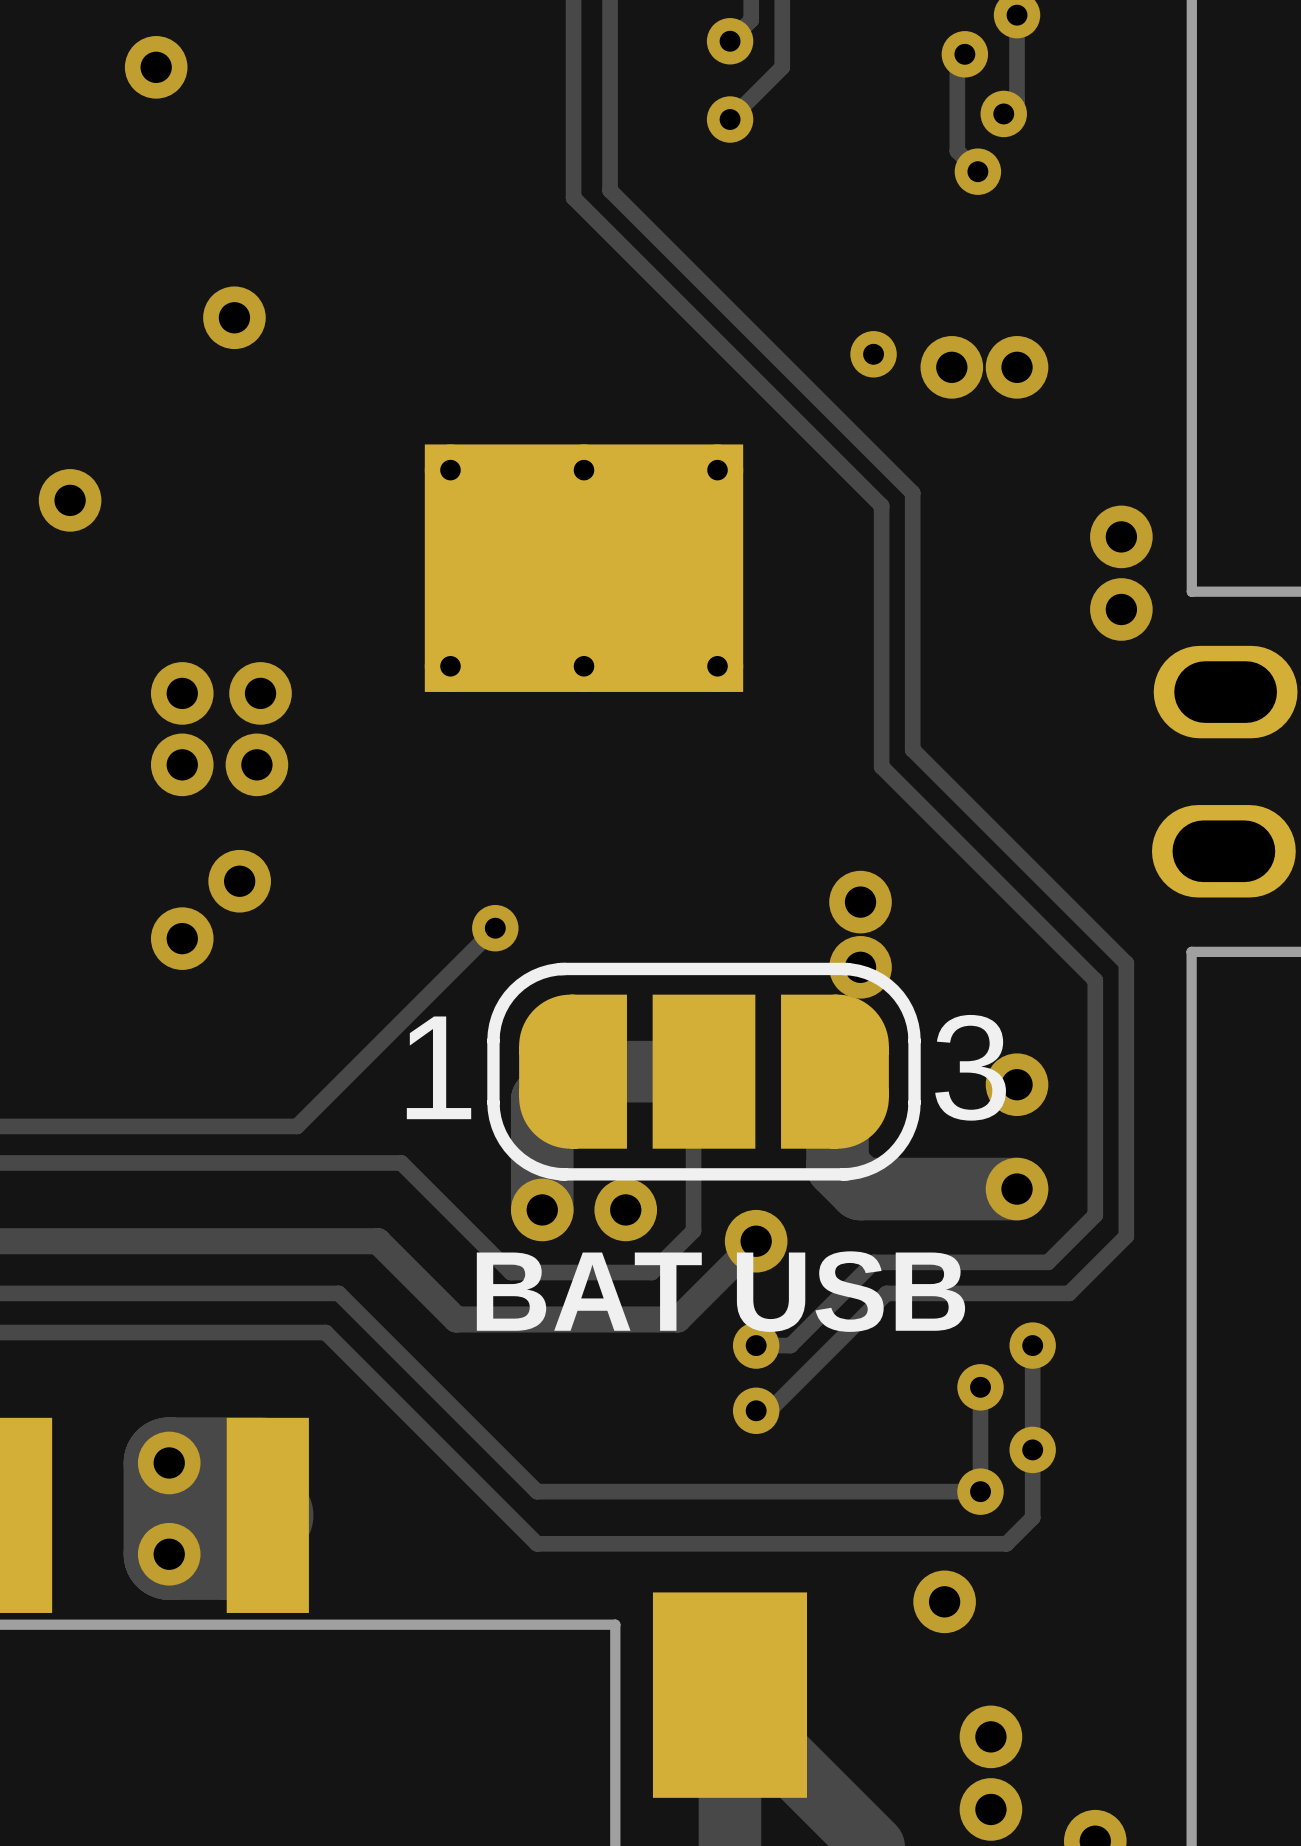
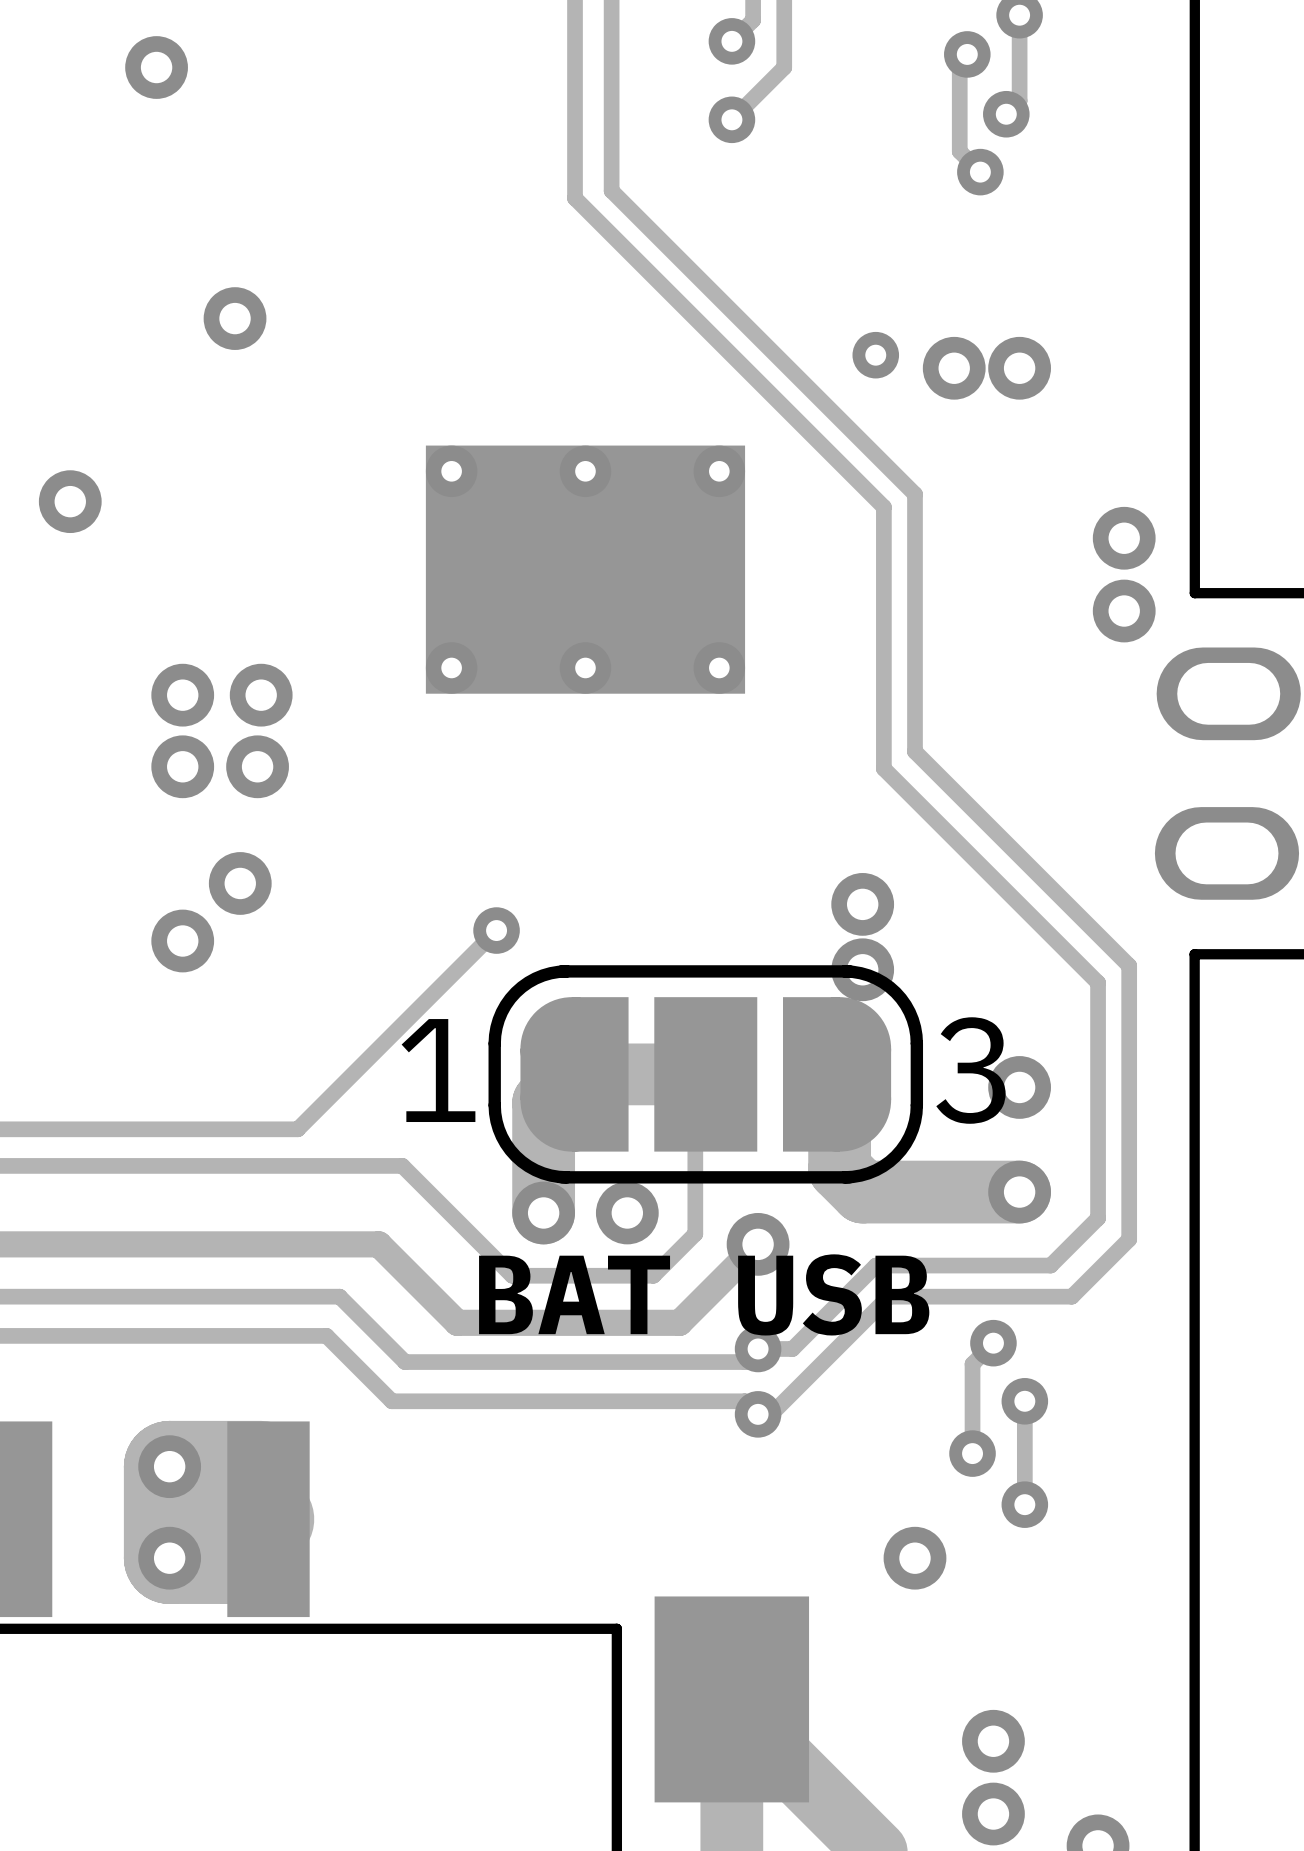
track: none -> (993, 1343) (972, 1364) (972, 1453)
track: (1032, 1345) (1032, 1517) (1006, 1543) (537, 1543) (390, 1397) -> (758, 1414) (745, 1401) (391, 1401)
via position: (1032, 1345) -> (993, 1343)
track: (404, 1358) (537, 1491) (980, 1491) (980, 1387) -> (405, 1362) (745, 1362) (758, 1348)
via position: (980, 1387) -> (1024, 1401)
track: none -> (1024, 1401) (1024, 1504)
via: none -> (972, 1453)
via: (1032, 1449) -> none
via: (980, 1491) -> none
via: none -> (1024, 1504)
via position: (944, 1601) -> (914, 1558)

